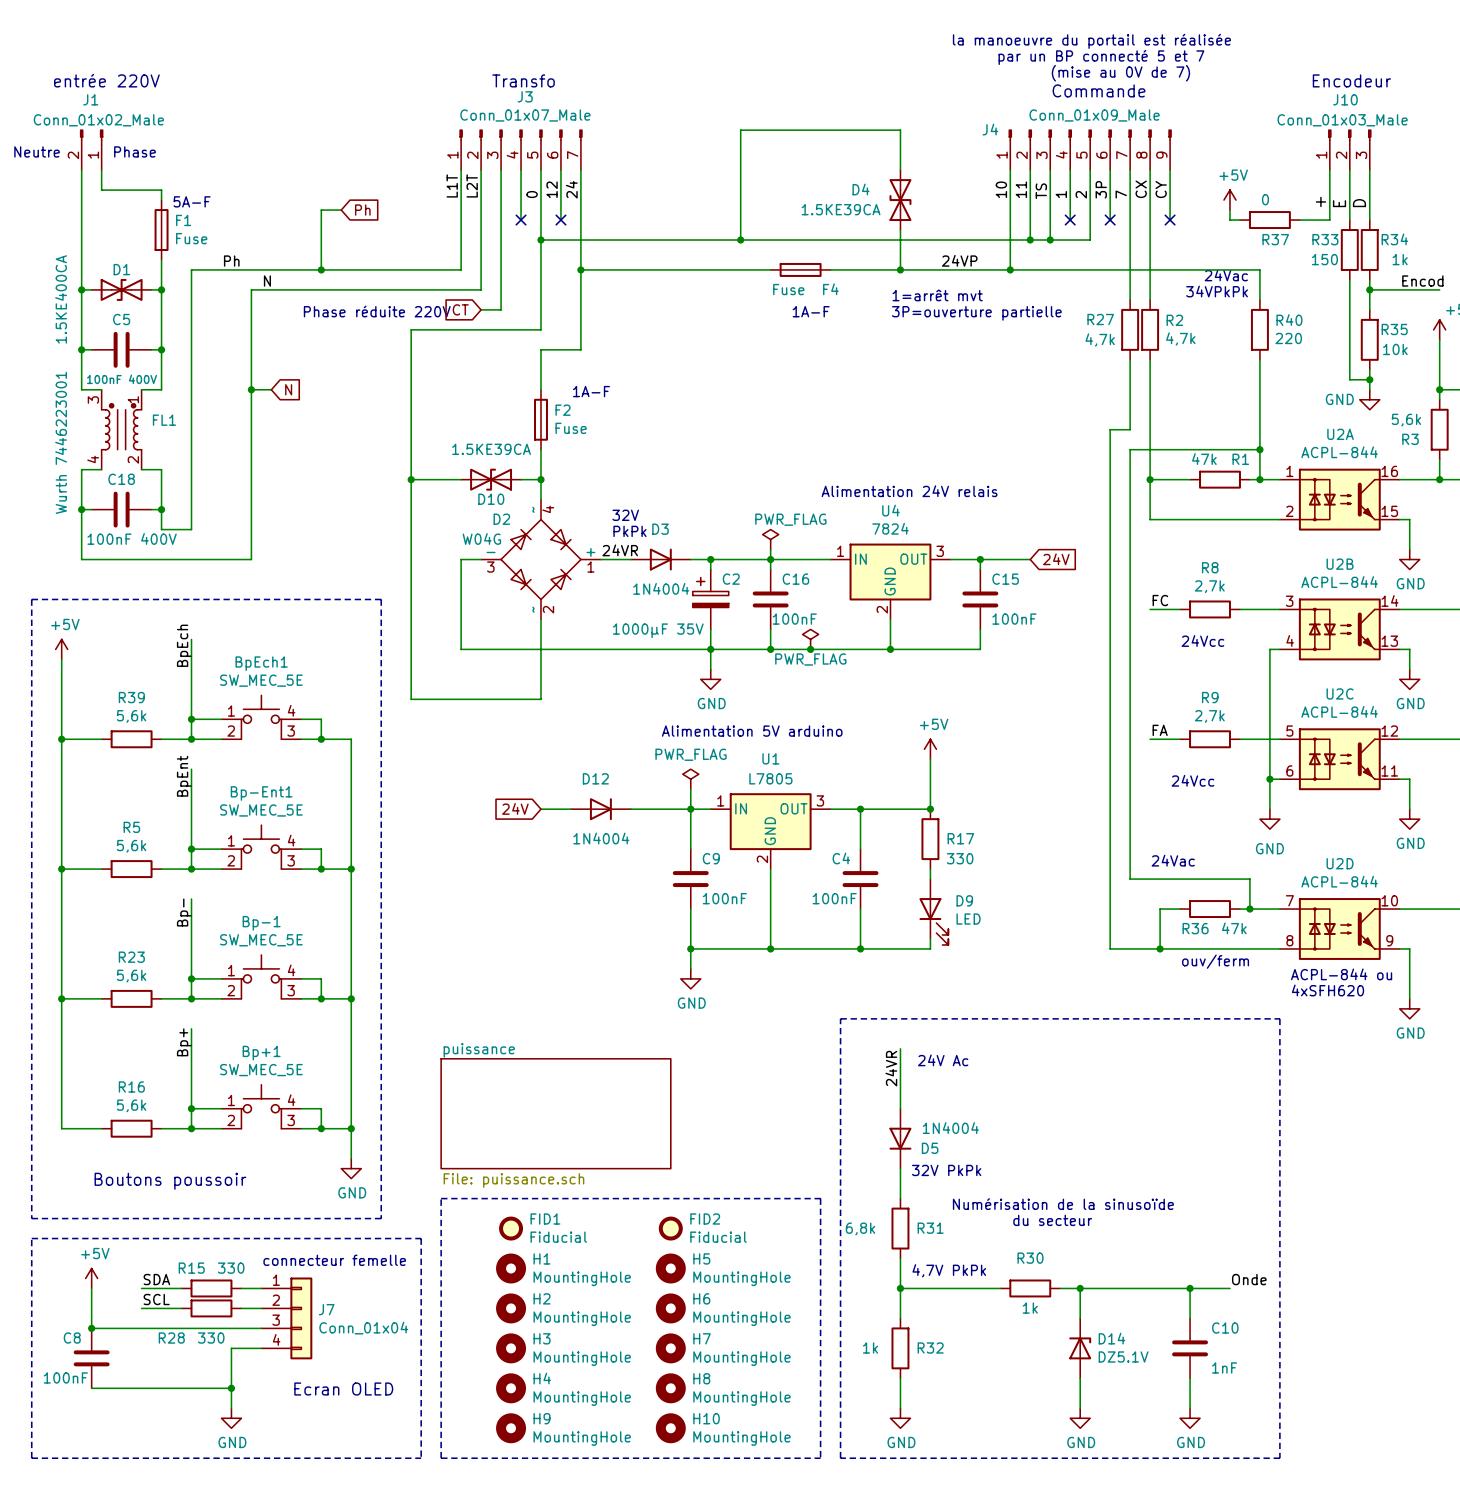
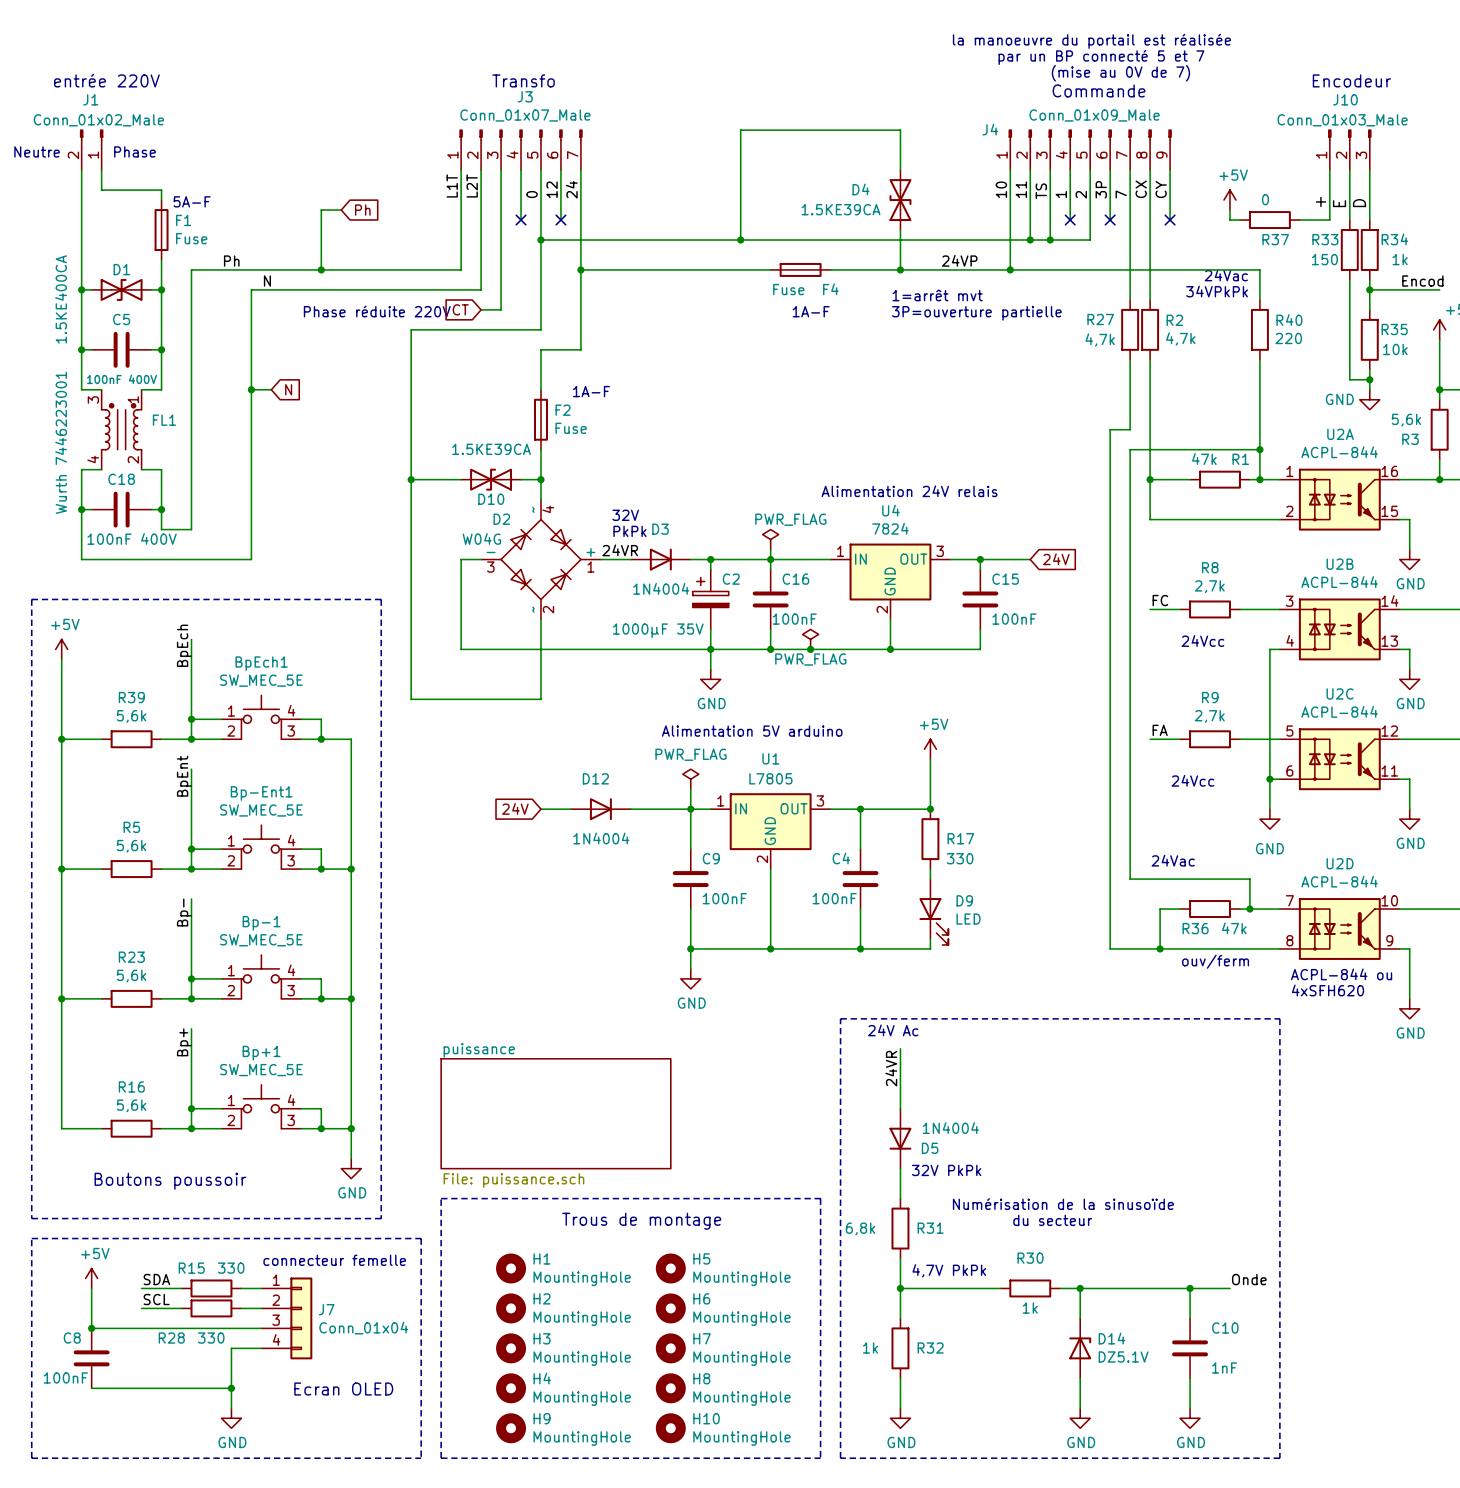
text position: 24V Ac (943, 1060) -> 24V Ac (893, 1030)
text: none -> Trous de montage (641, 1221)
FID1: Fiducial (511, 1228) -> none
FID2: Fiducial (670, 1228) -> none

